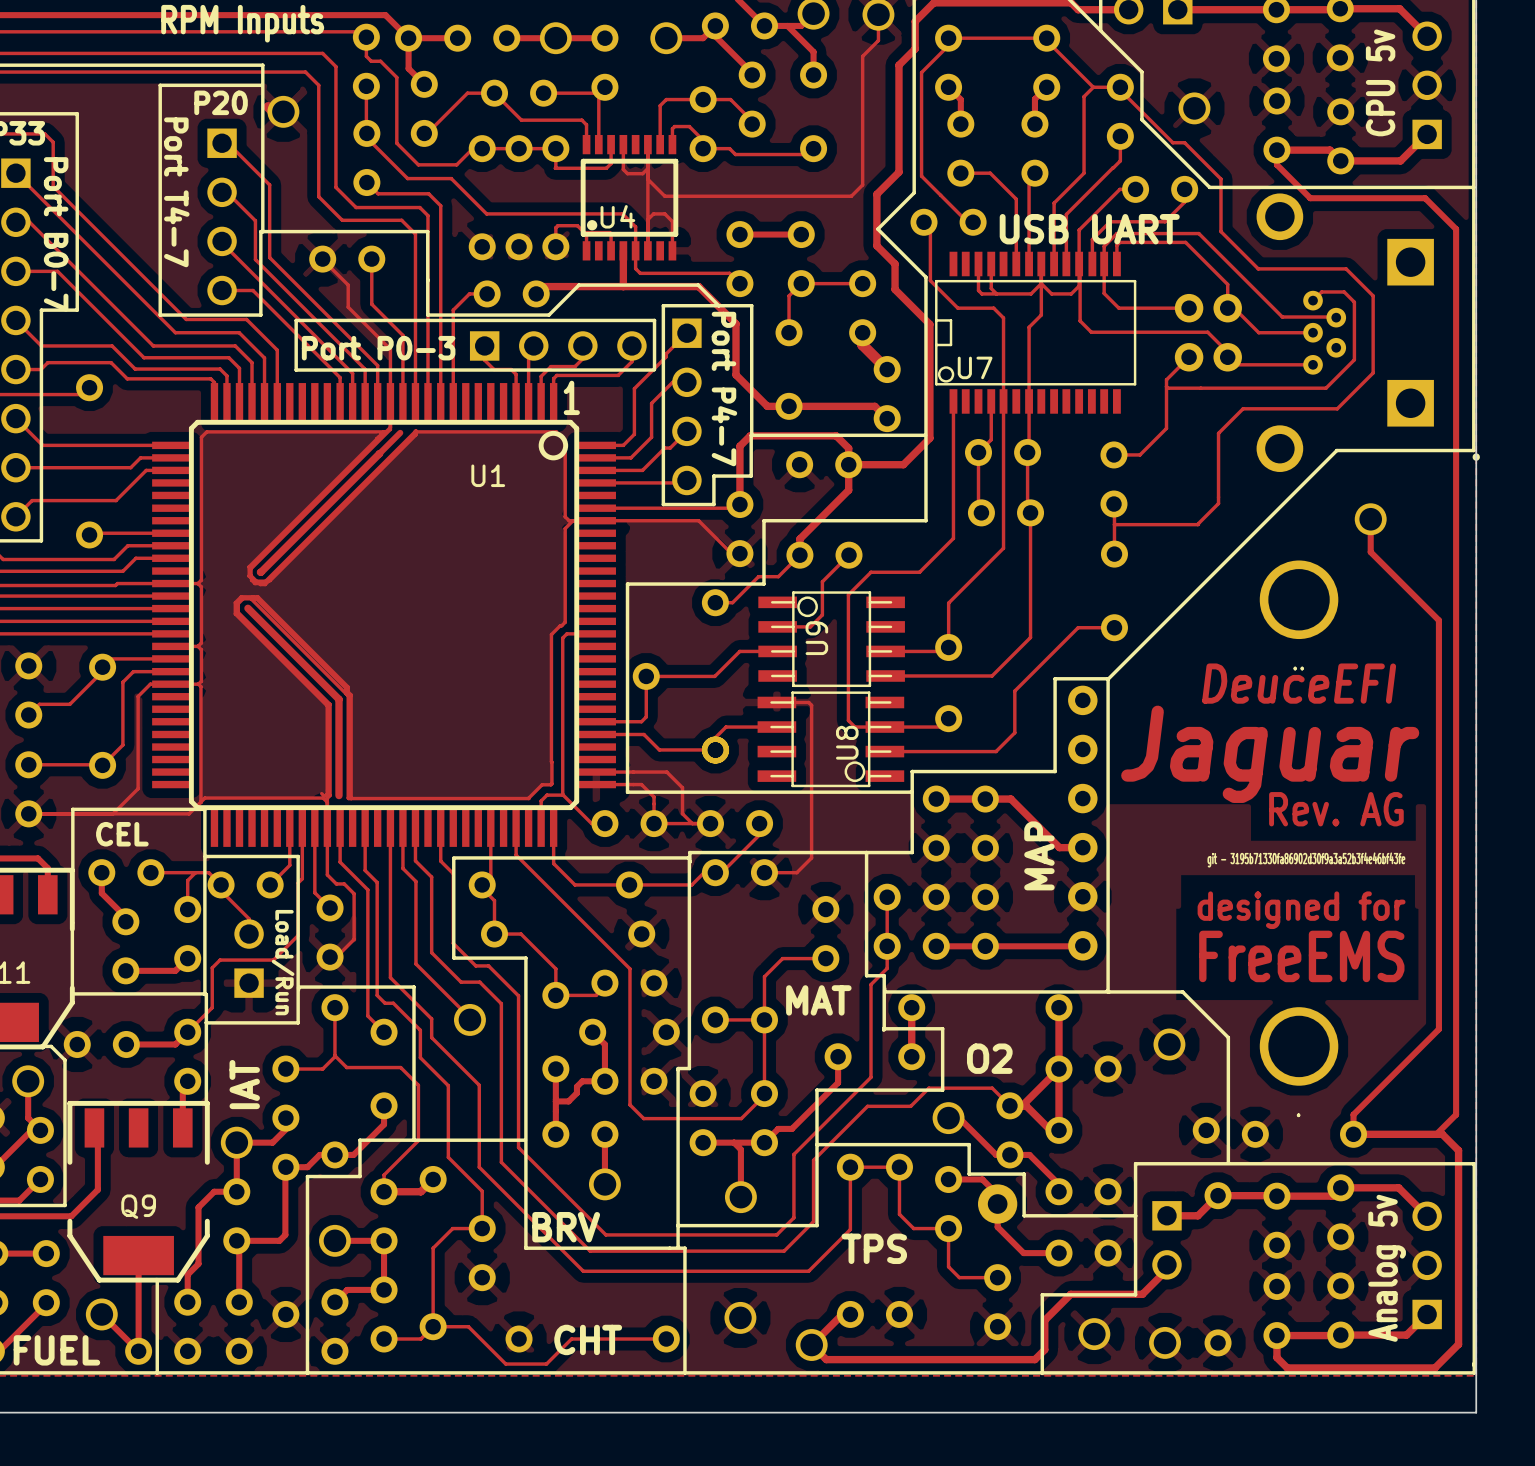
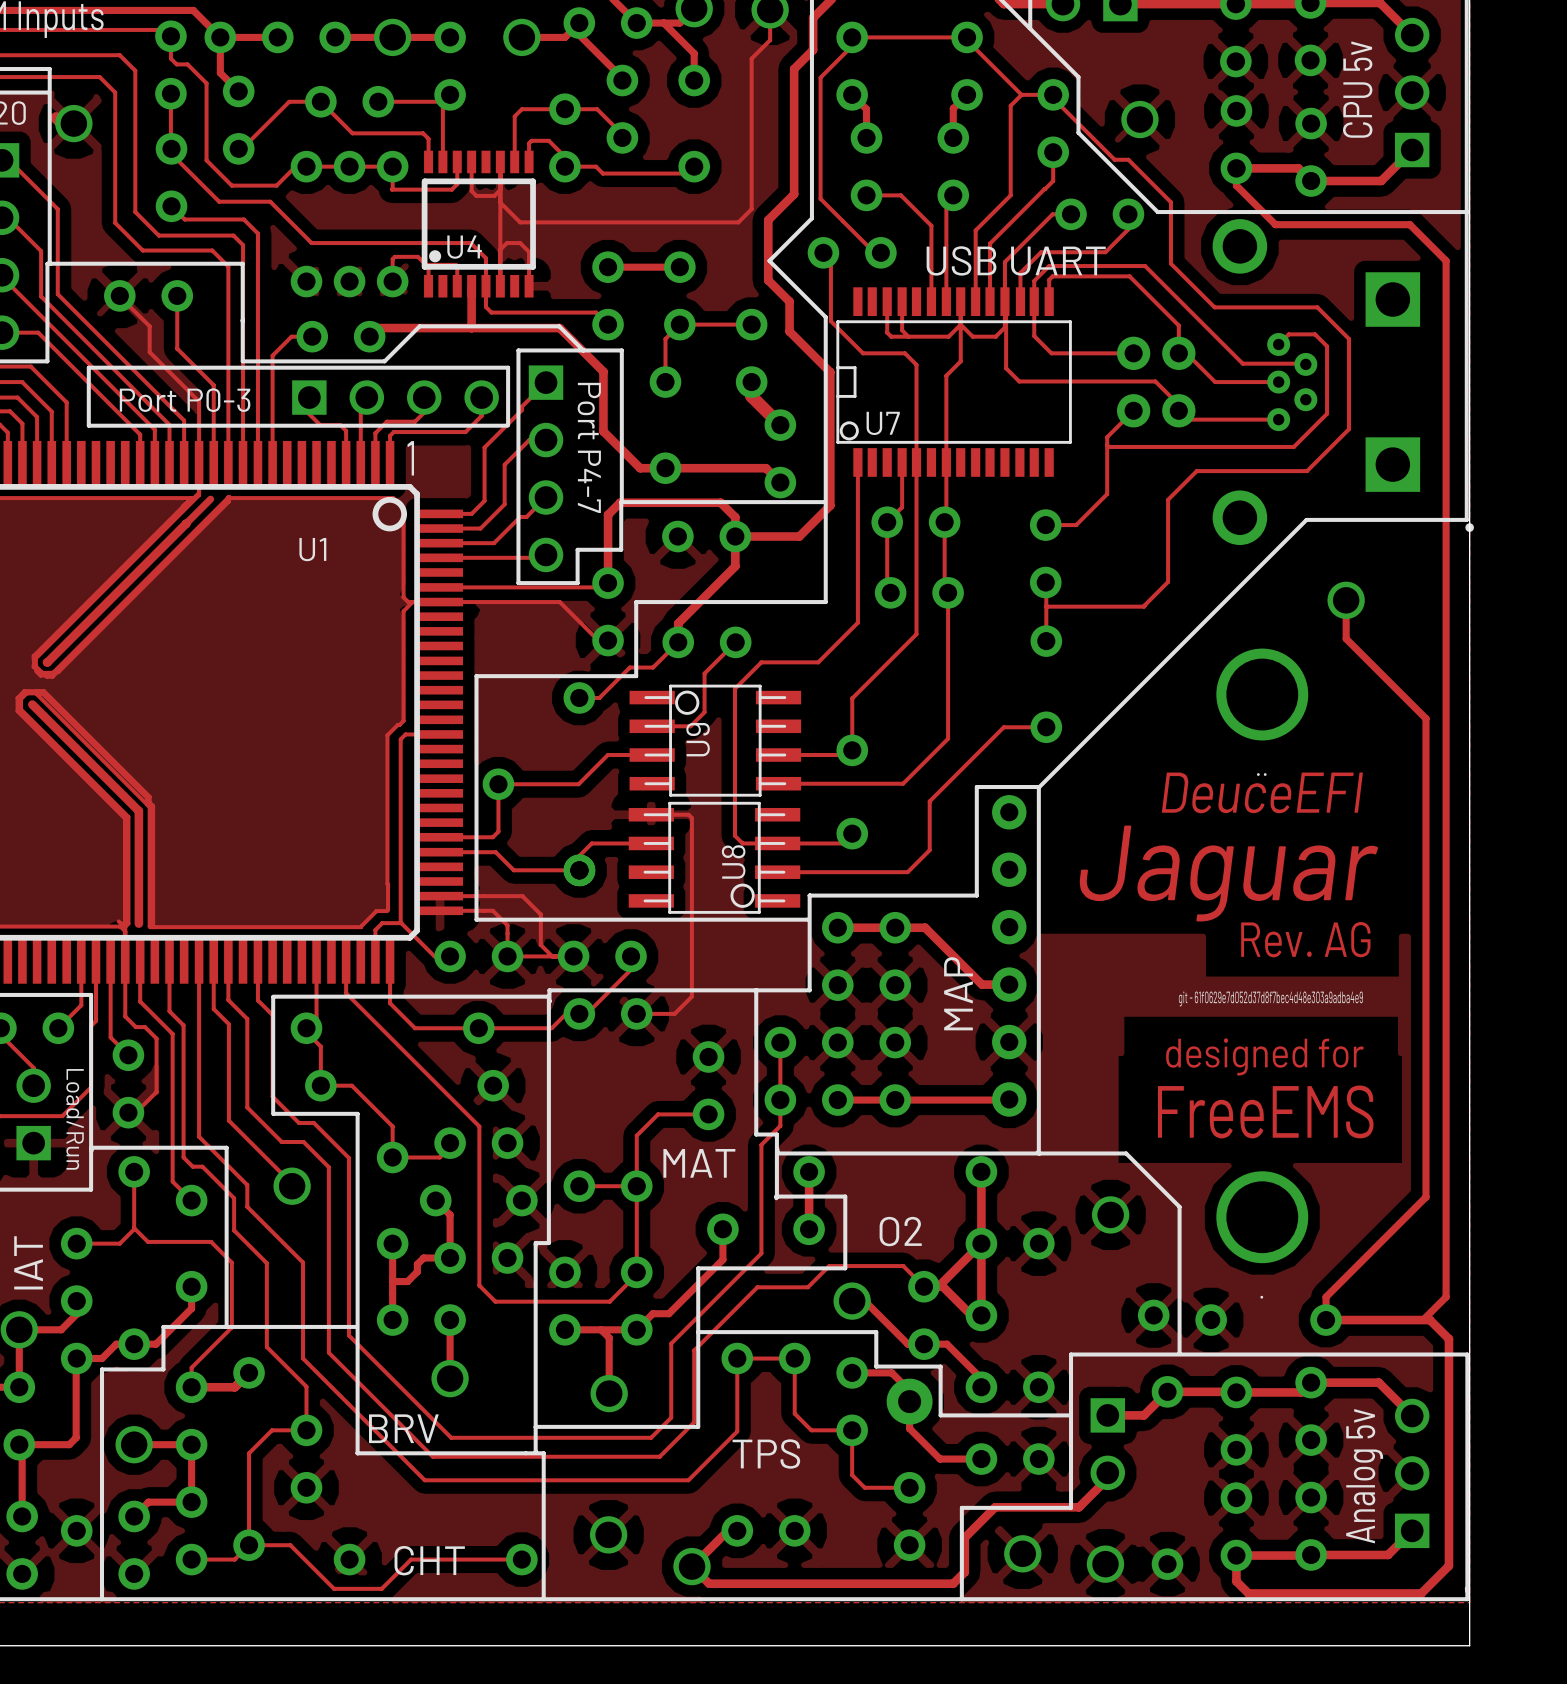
text: git - 3195b71330fa86902d30f9a3a52b3f4e46bf43fe (1306, 859) -> git - 61f0629e7d052d37d8f7bec4d48e303a9adba4e9 (1270, 998)

